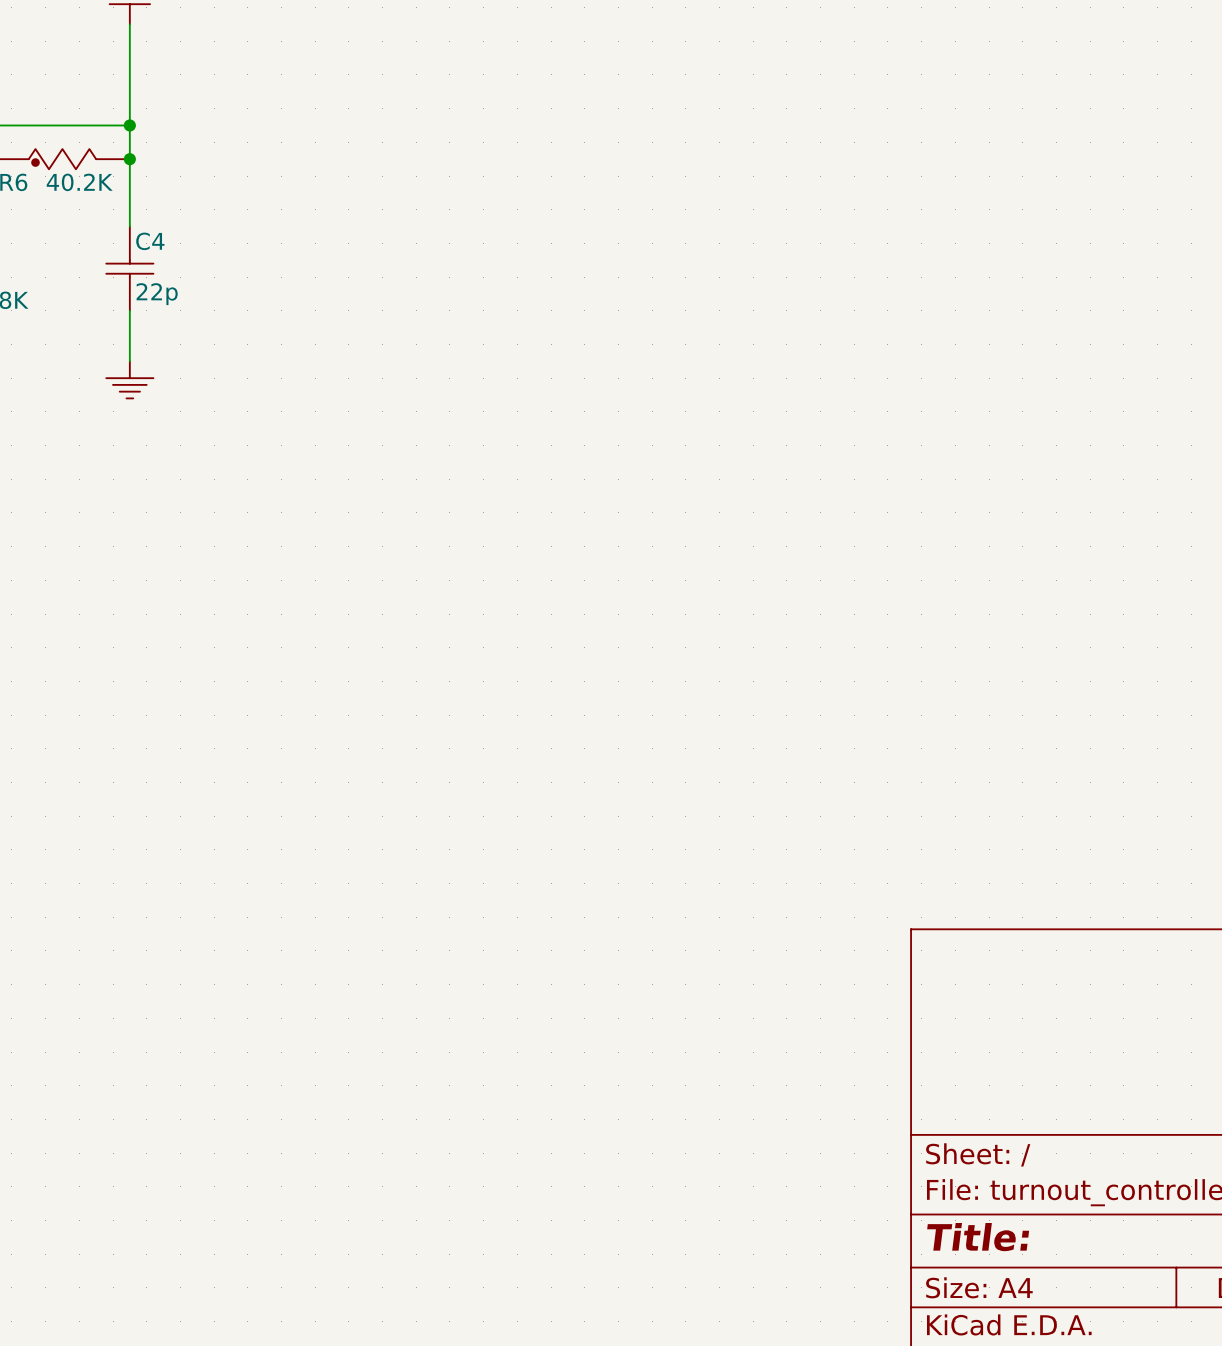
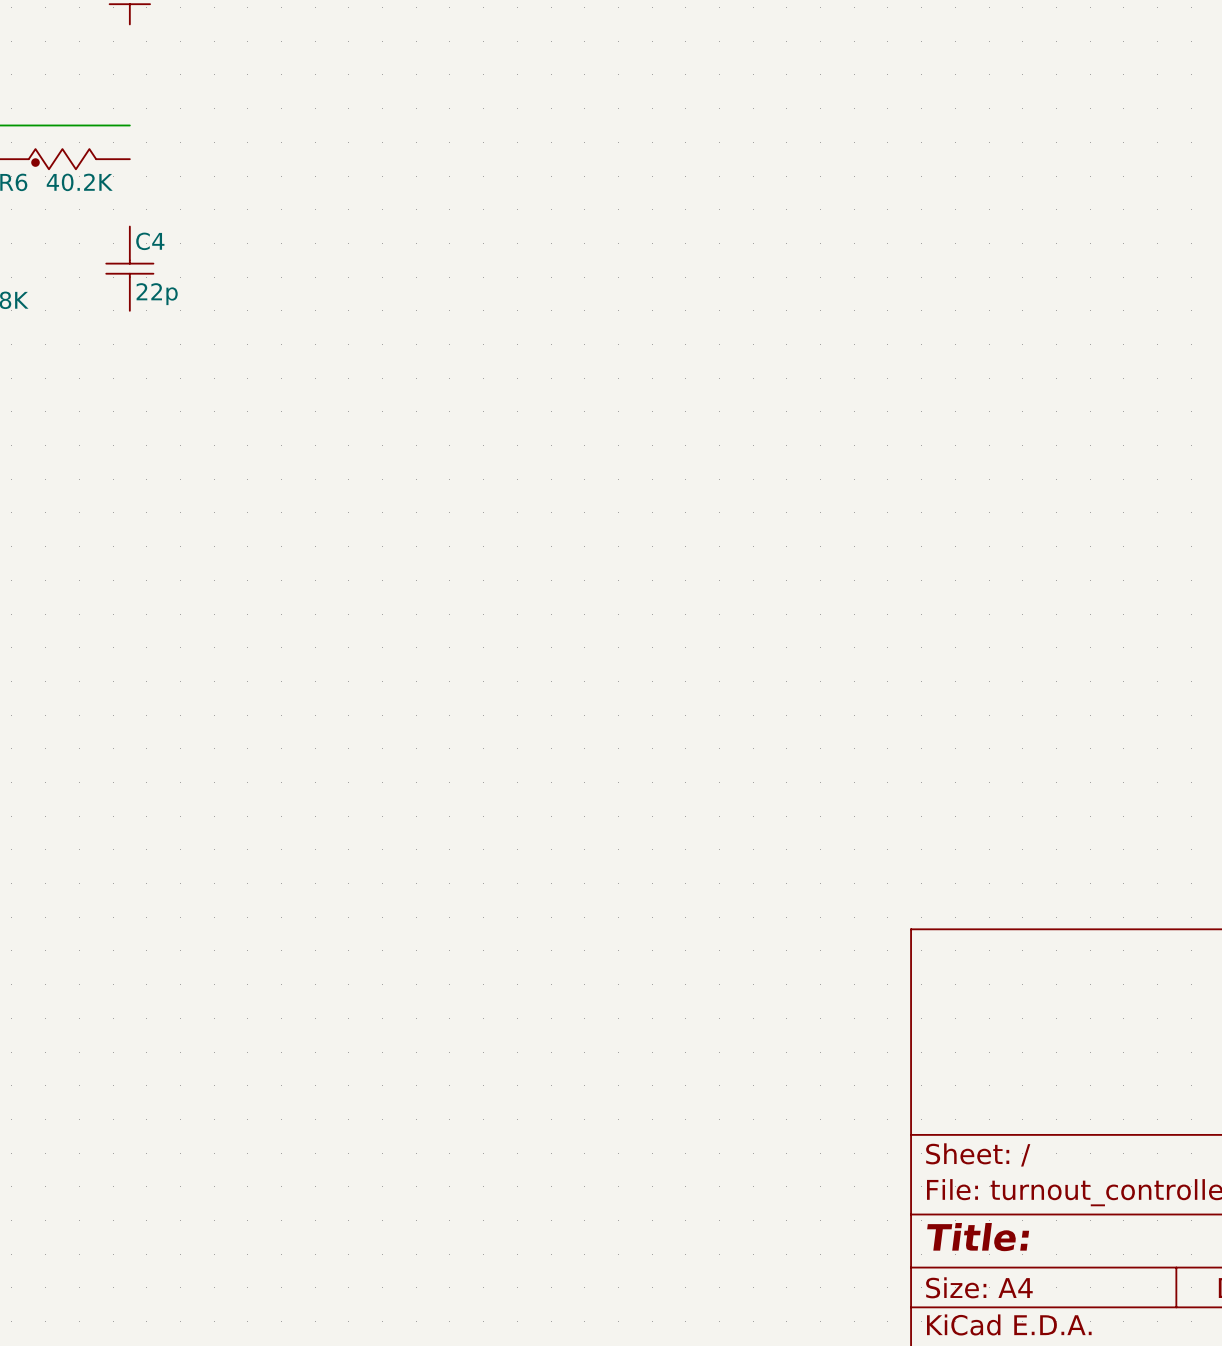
wire: (129, 24) (129, 226) -> none
junction: (129, 125) -> none
junction: (129, 159) -> none
wire: (129, 310) (129, 361) -> none
power symbol: (129, 379) -> none

